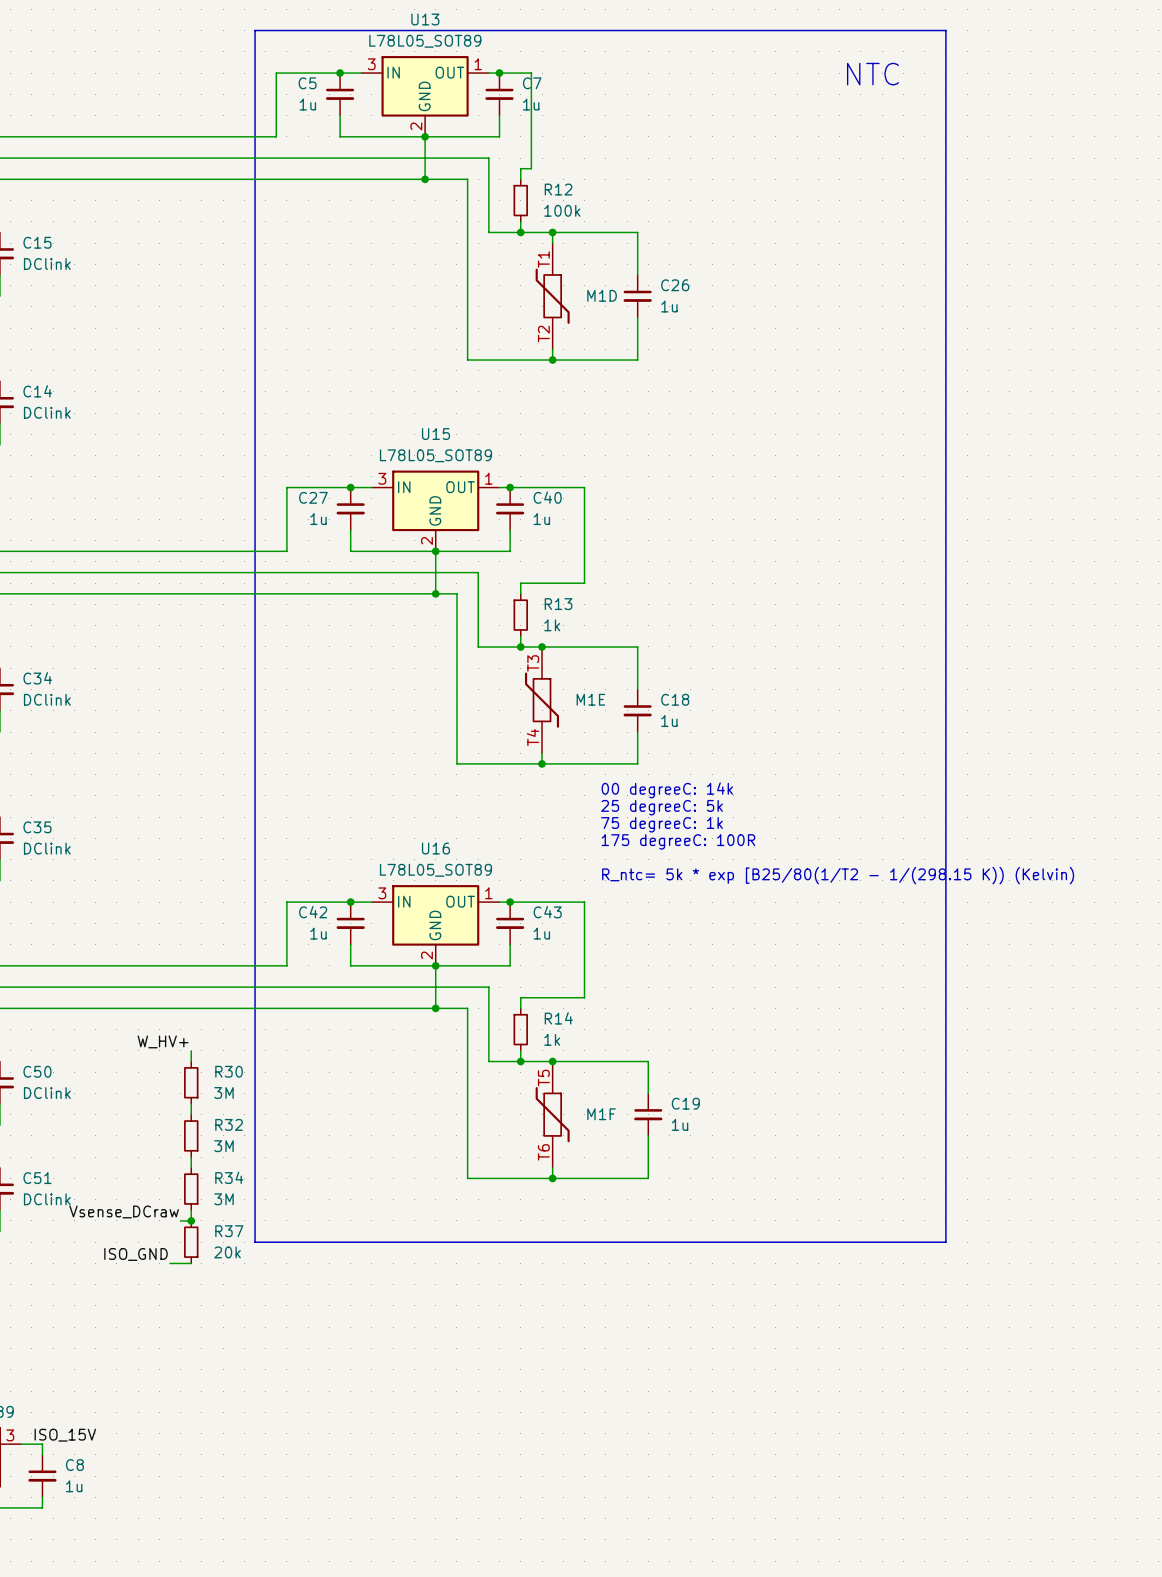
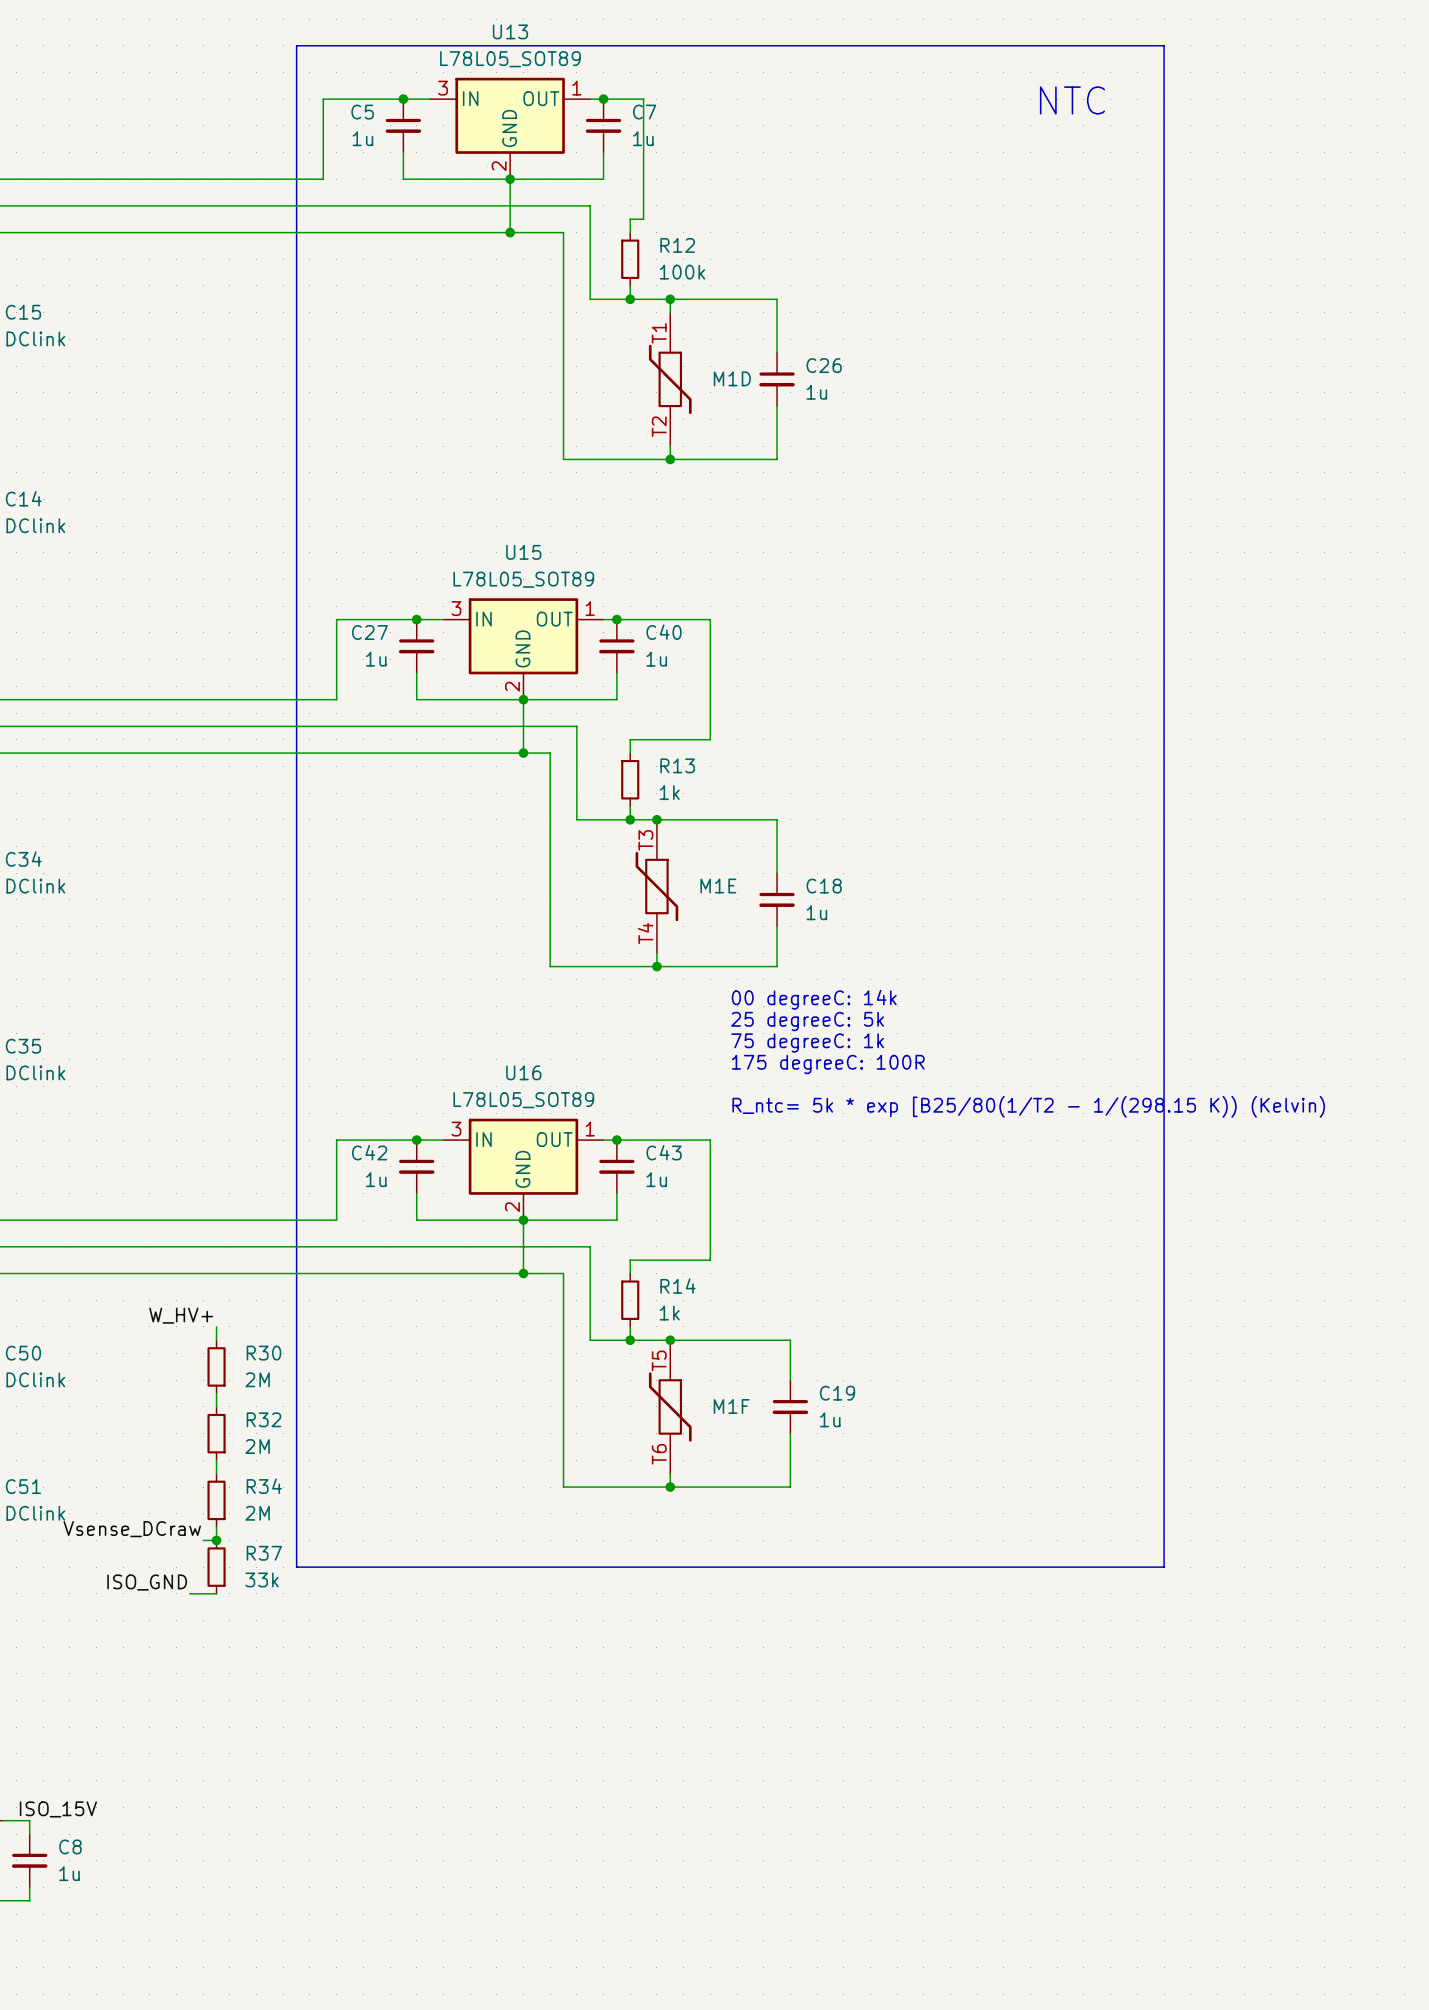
R30 value: 3M (223, 1093) -> 2M (257, 1379)
R32 value: 3M (223, 1146) -> 2M (257, 1446)
R34 value: 3M (223, 1199) -> 2M (257, 1513)
R37 value: 20k (227, 1252) -> 33k (262, 1579)

